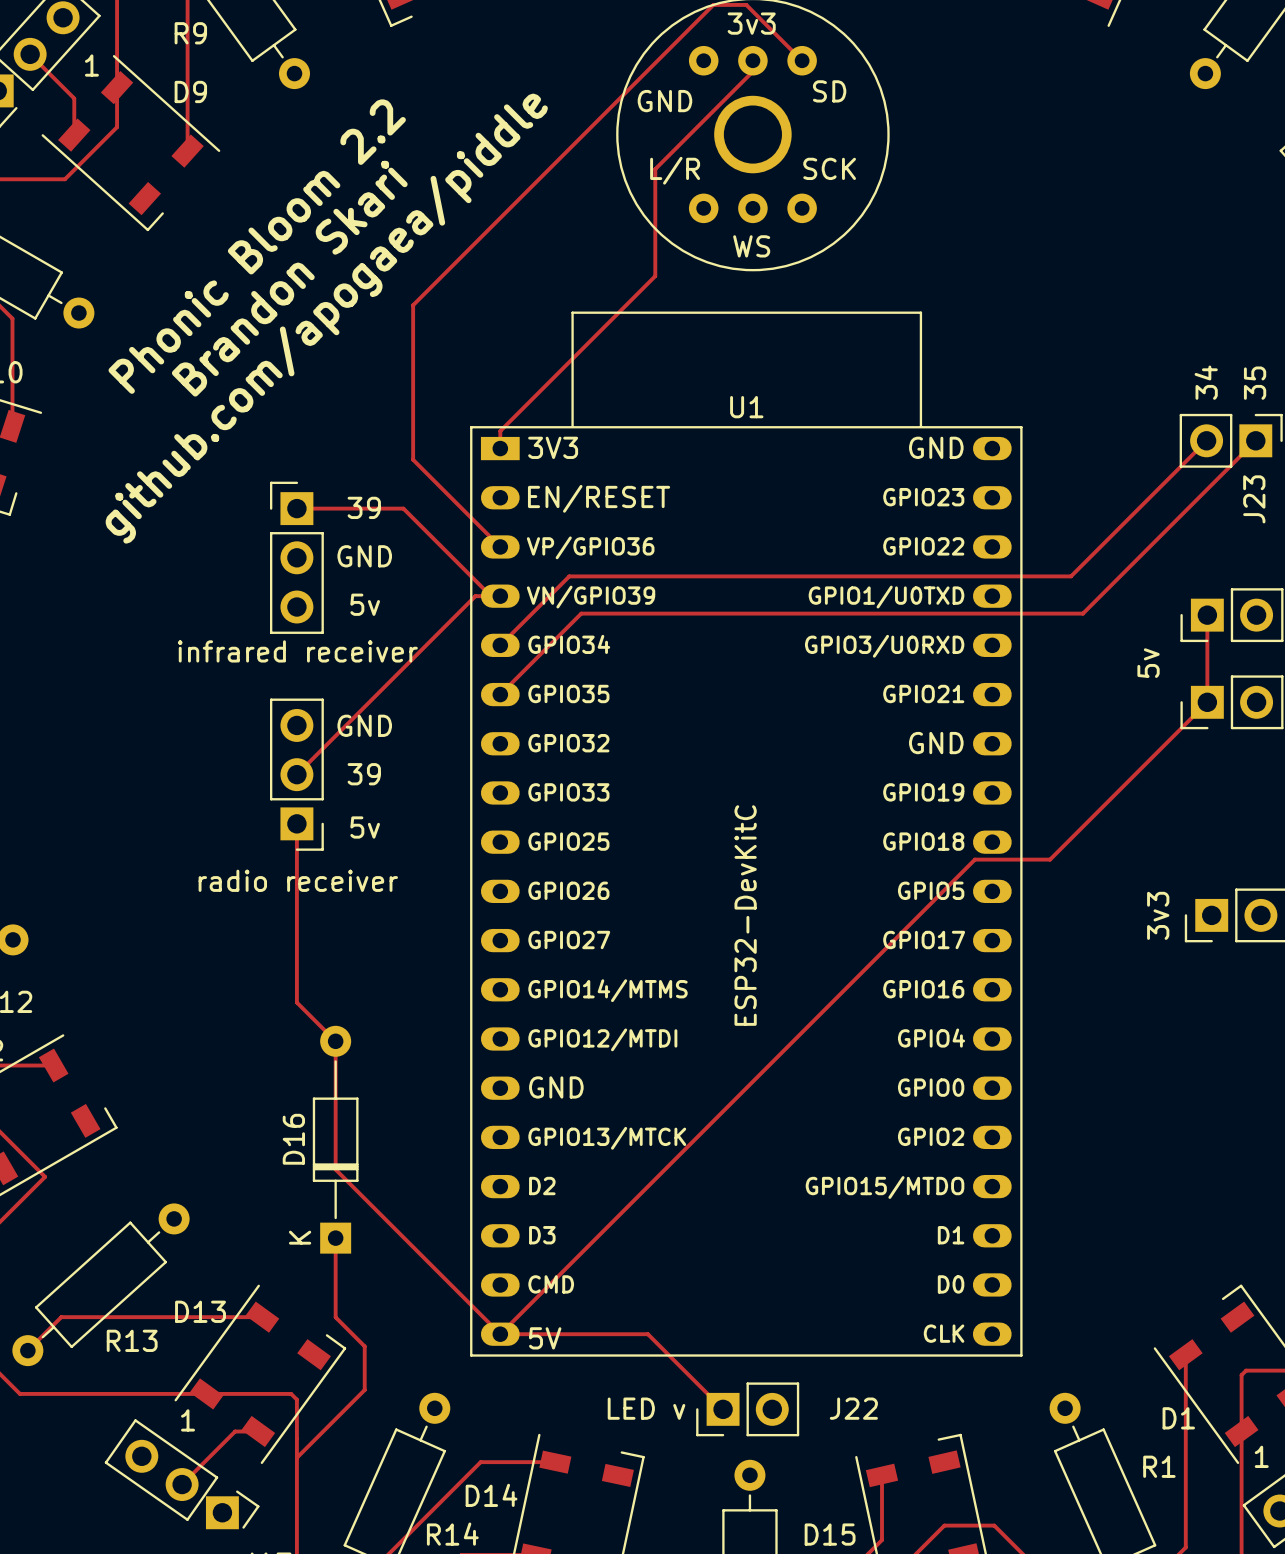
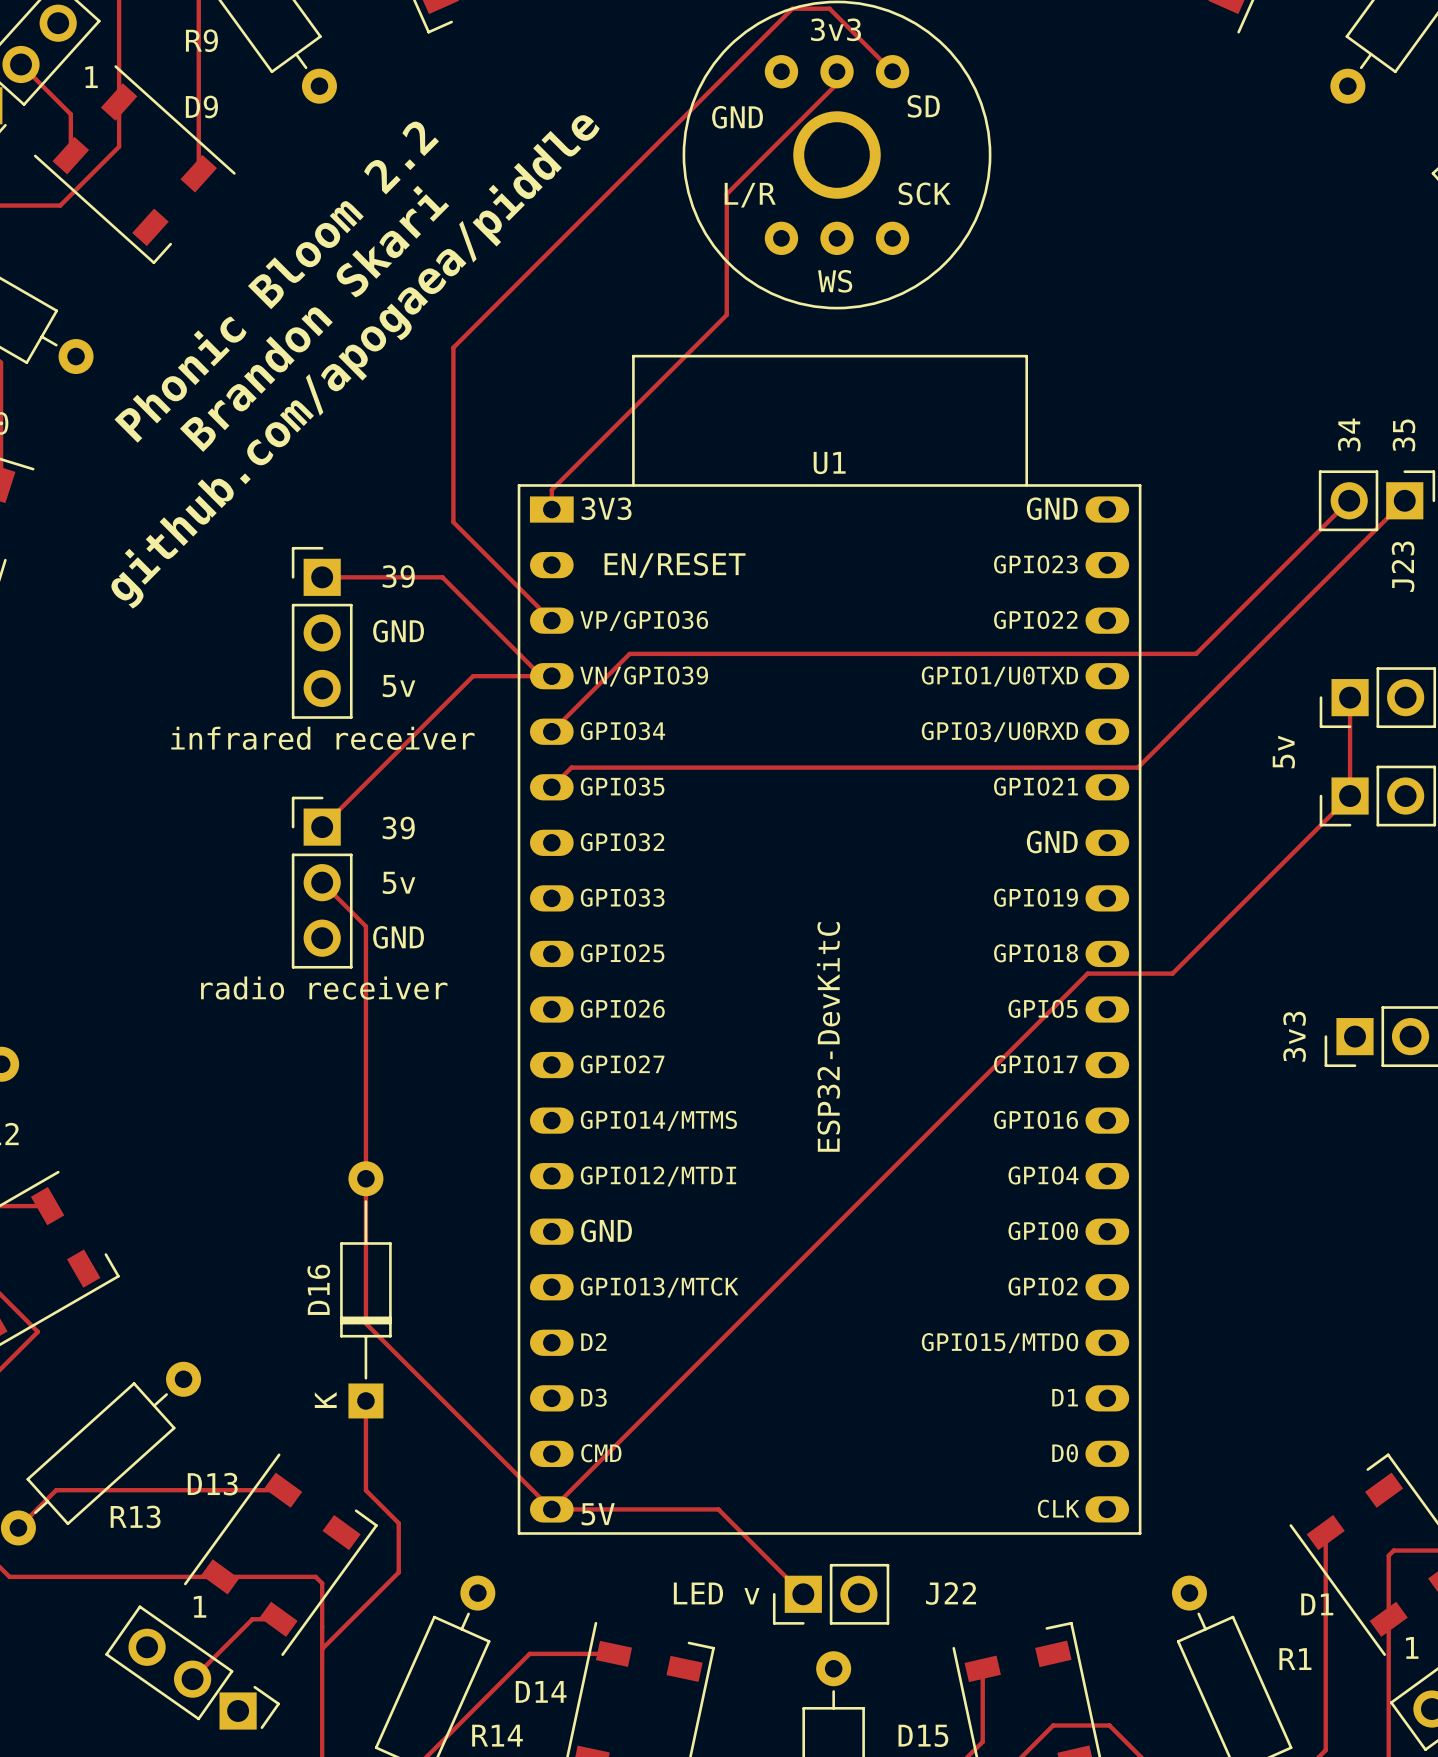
track: (475, 596) (296, 774) -> (523, 676) (473, 676) (322, 827)
track: (1082, 613) (581, 613) (517, 677) -> (1209, 695) (1137, 767) (571, 767)
text: GND (364, 725) -> 39 (398, 828)
part rotation: 0° (296, 774) -> 180° (322, 882)
text: 39 (364, 774) -> 5v (399, 882)
track: (296, 823) (296, 1002) (335, 1041) -> (322, 882) (365, 926) (365, 1178)
text: 5v (365, 827) -> GND (398, 937)

